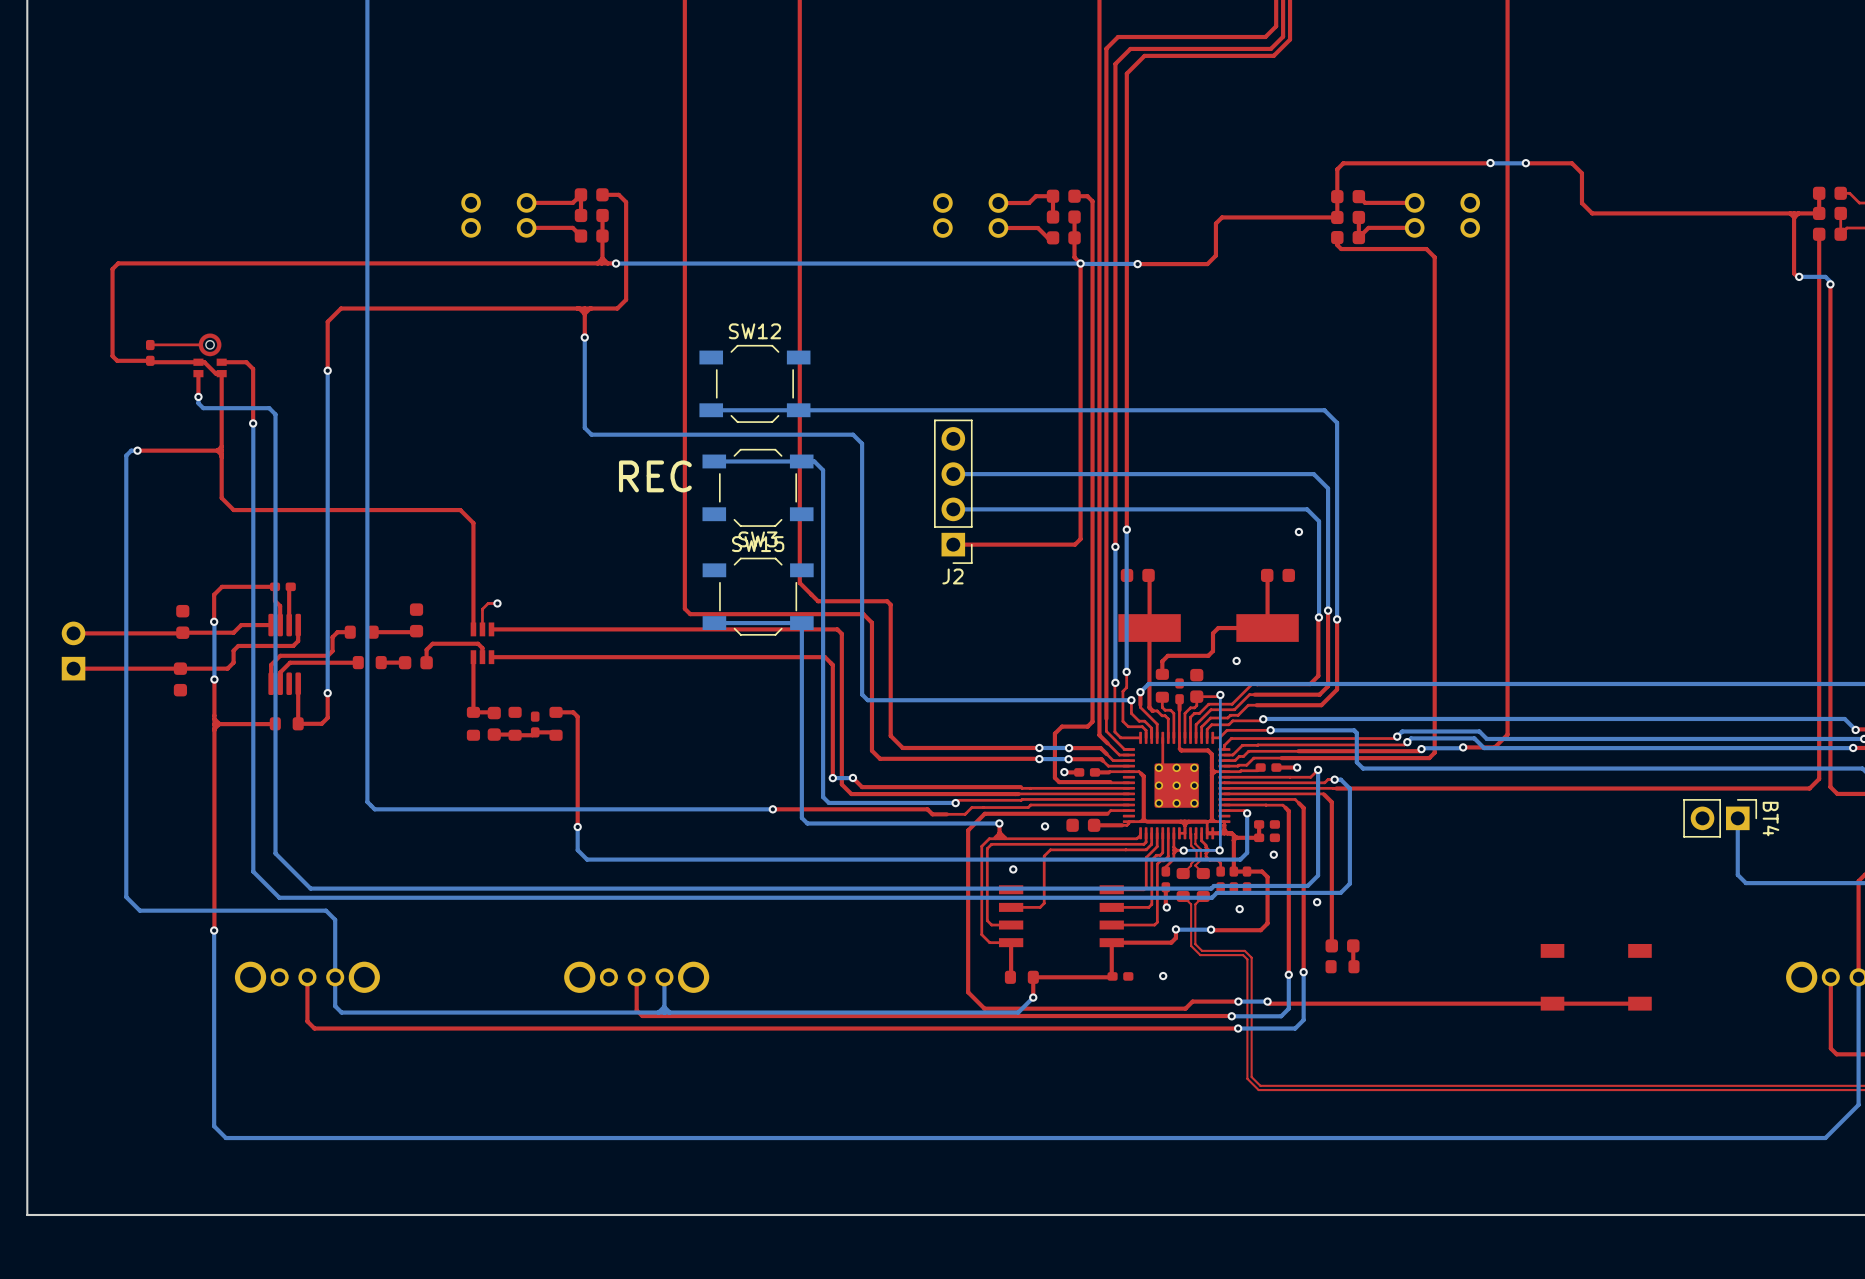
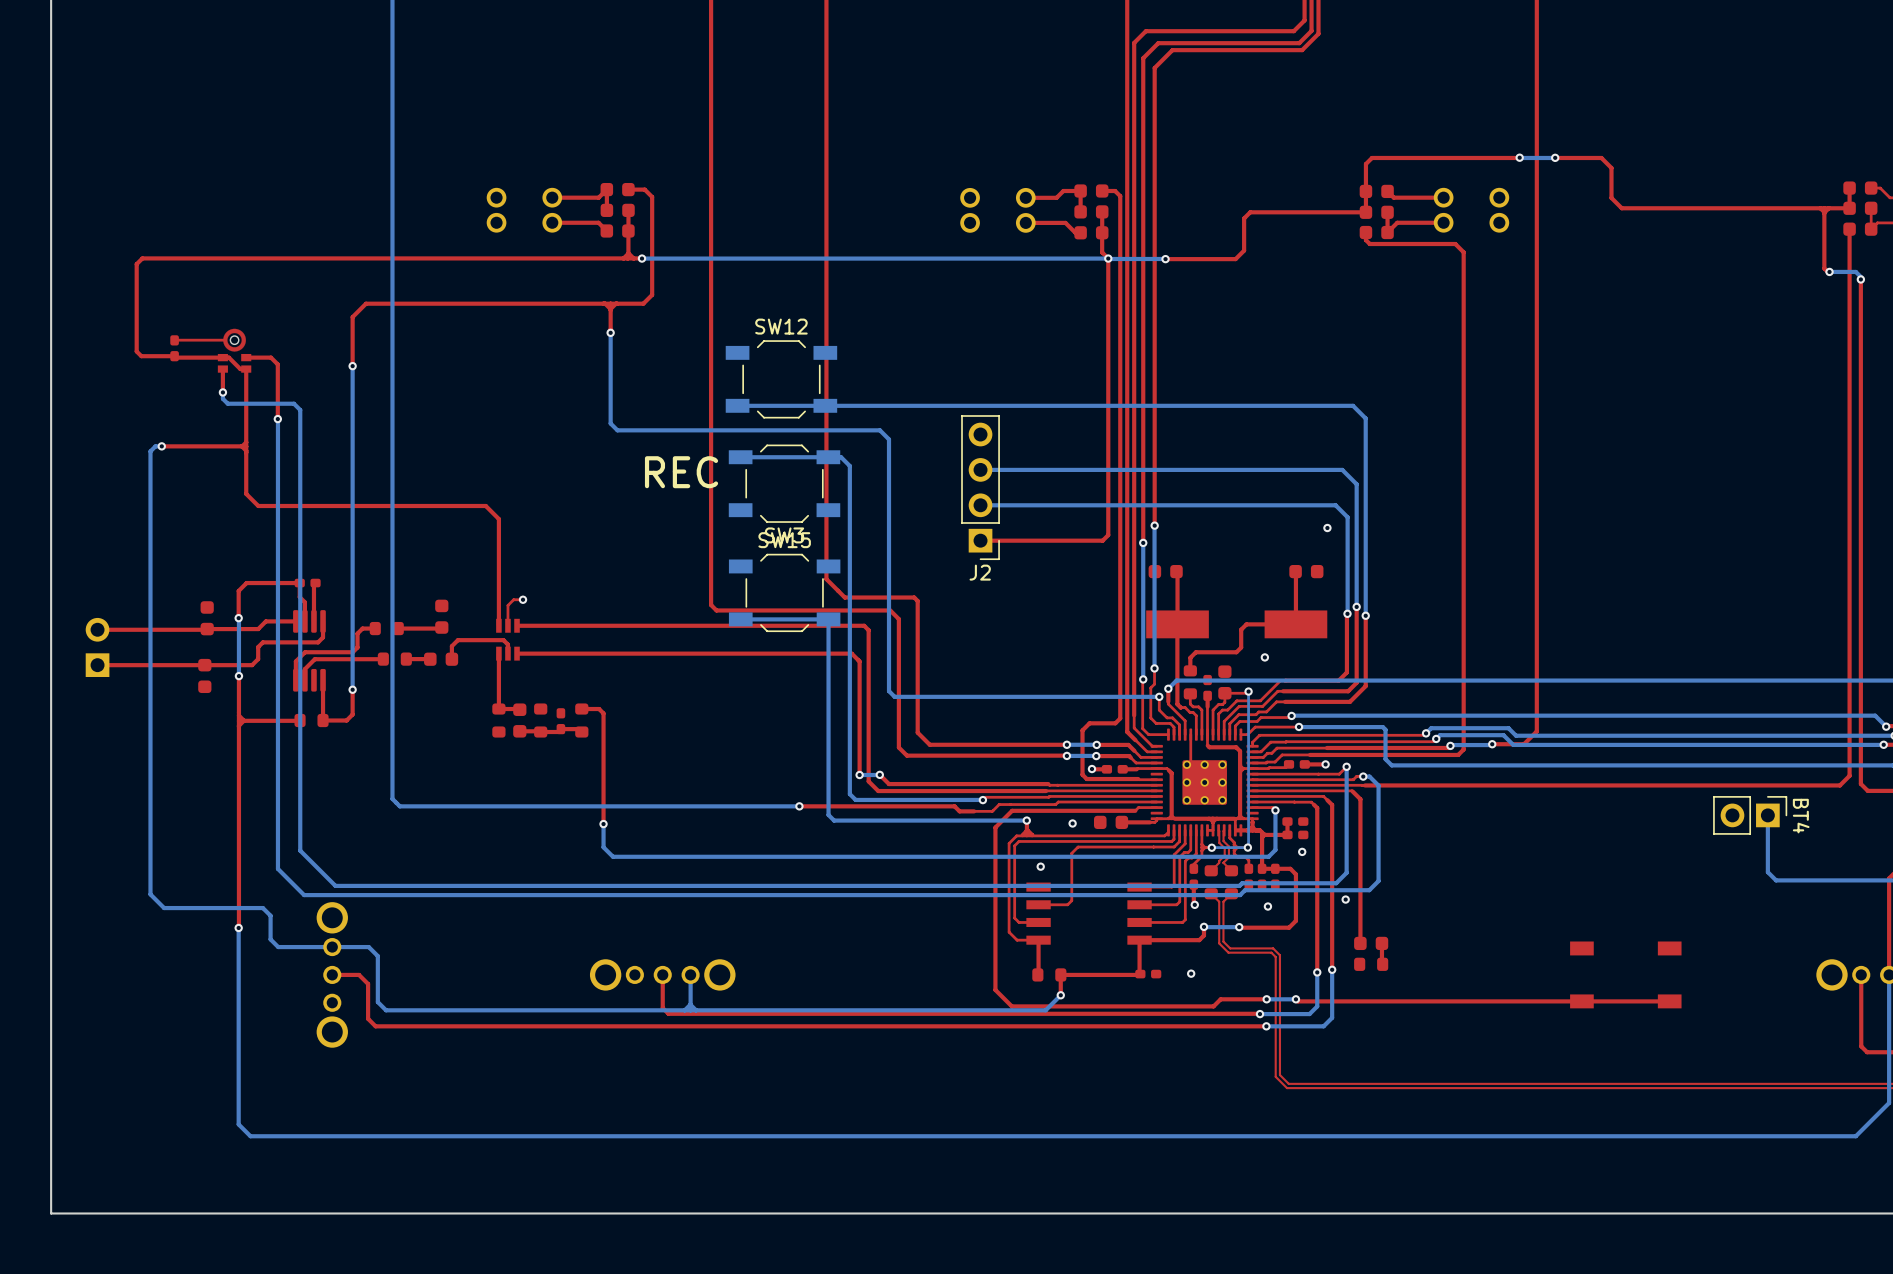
bottom track: (238, 910) (326, 910) (335, 919) (335, 1006) (341, 1012) (361, 1012) -> (262, 908) (270, 915) (270, 939) (278, 947) (368, 947) (377, 956) (377, 1002) (386, 1010)
top track: (307, 977) (307, 1021) (314, 1028) (350, 1028) -> (332, 974) (359, 974) (368, 983) (368, 1018) (375, 1026)
part rotation: 0° (307, 977) -> 90° clockwise (332, 974)

